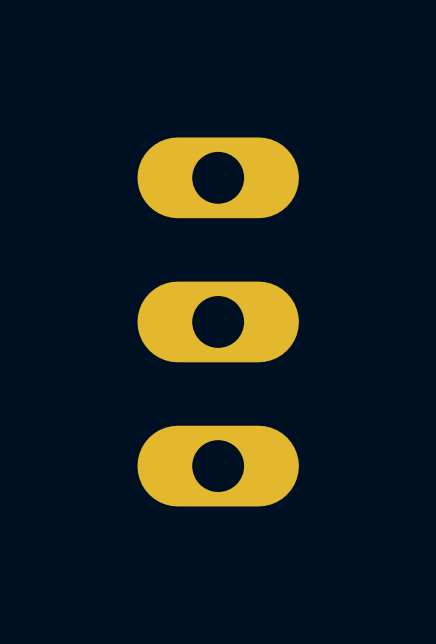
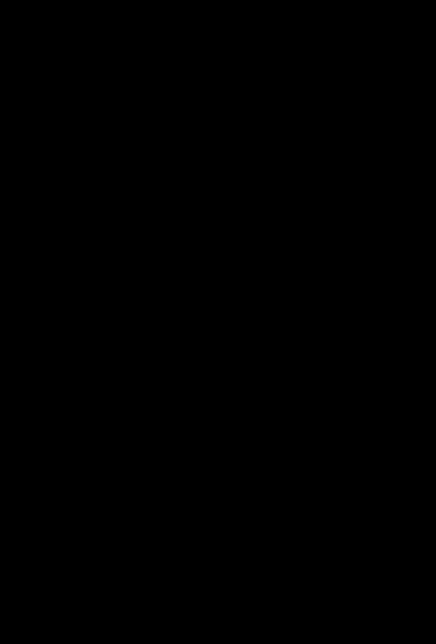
part: (218, 321) -> none

